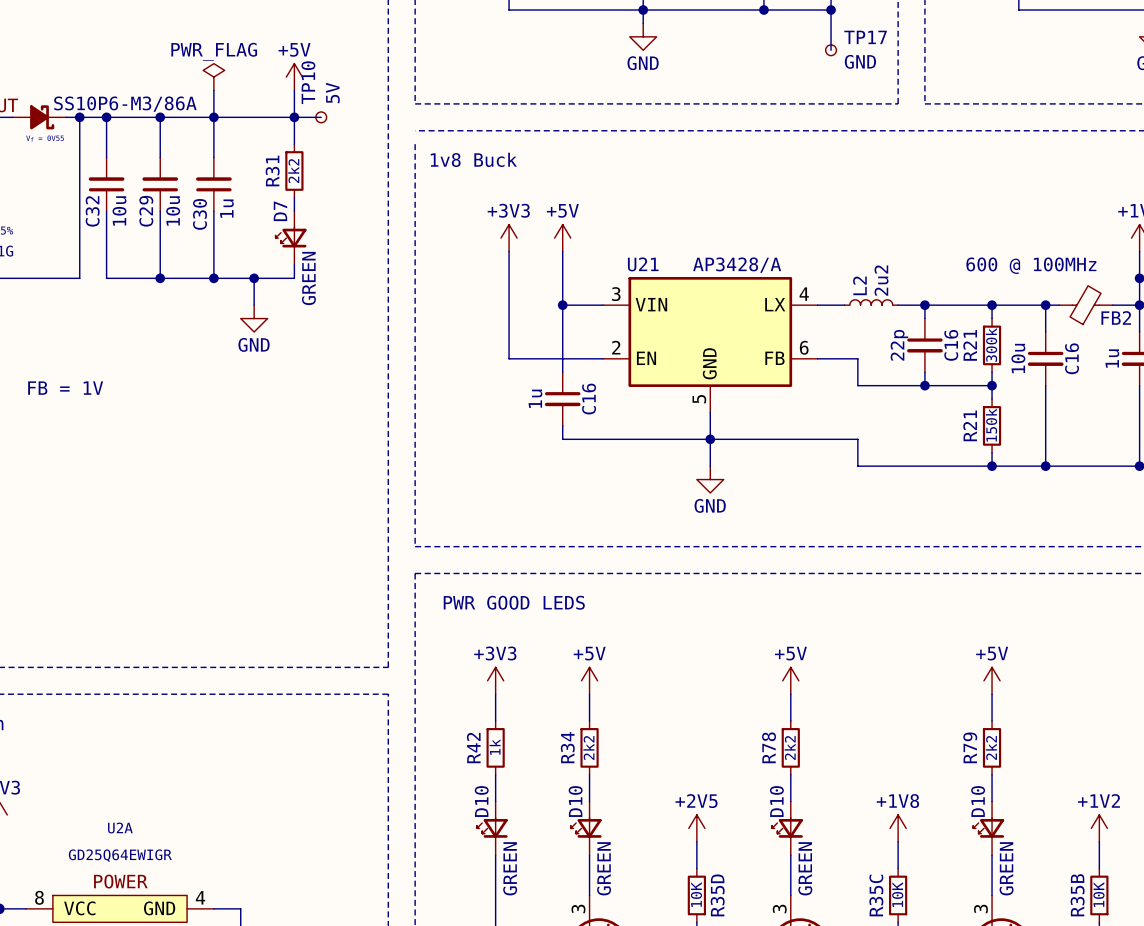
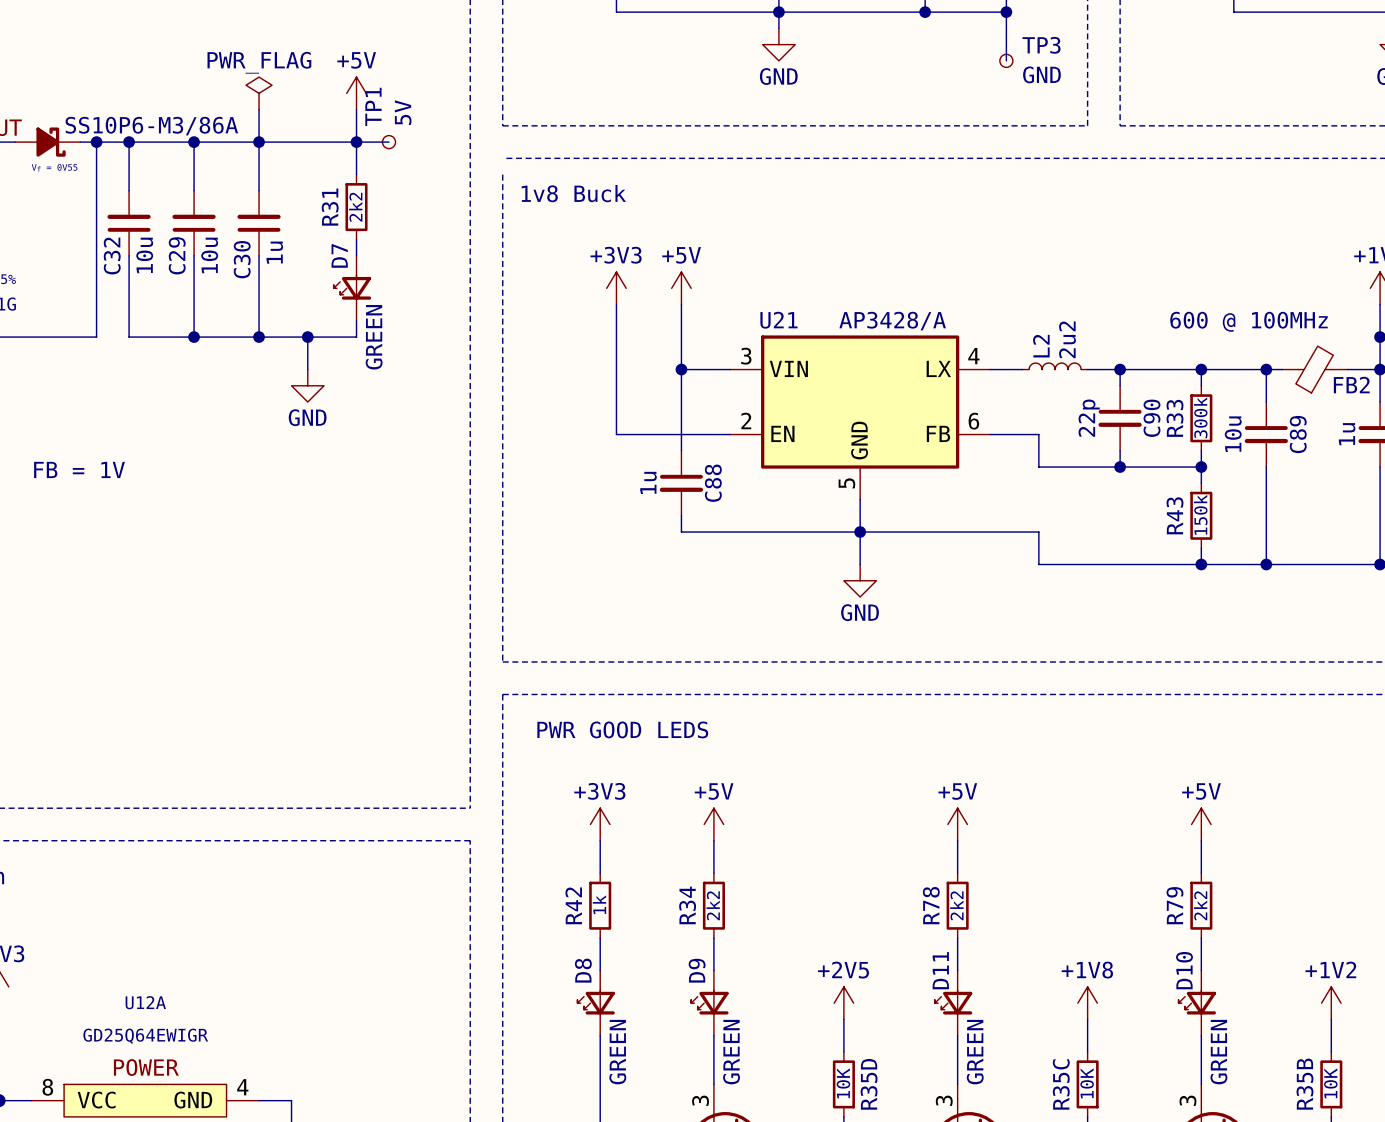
TP17 name: TP17 (865, 37) -> TP3 (1041, 45)
TP10 name: TP10 (308, 82) -> TP1 (373, 106)
C16 name: C16 (951, 345) -> C90 (1152, 418)
R21 name: R21 (970, 345) -> R33 (1174, 418)
C16 name: C16 (1072, 358) -> C89 (1298, 434)
C16 name: C16 (589, 399) -> C88 (713, 483)
R21 name: R21 (970, 425) -> R43 (1174, 515)
D10 name: D10 (481, 801) -> D8 (583, 970)
D10 name: D10 (575, 801) -> D9 (697, 970)
D10 name: D10 (776, 801) -> D11 (940, 970)
U2A name: U2A (120, 828) -> U12A (145, 1002)

